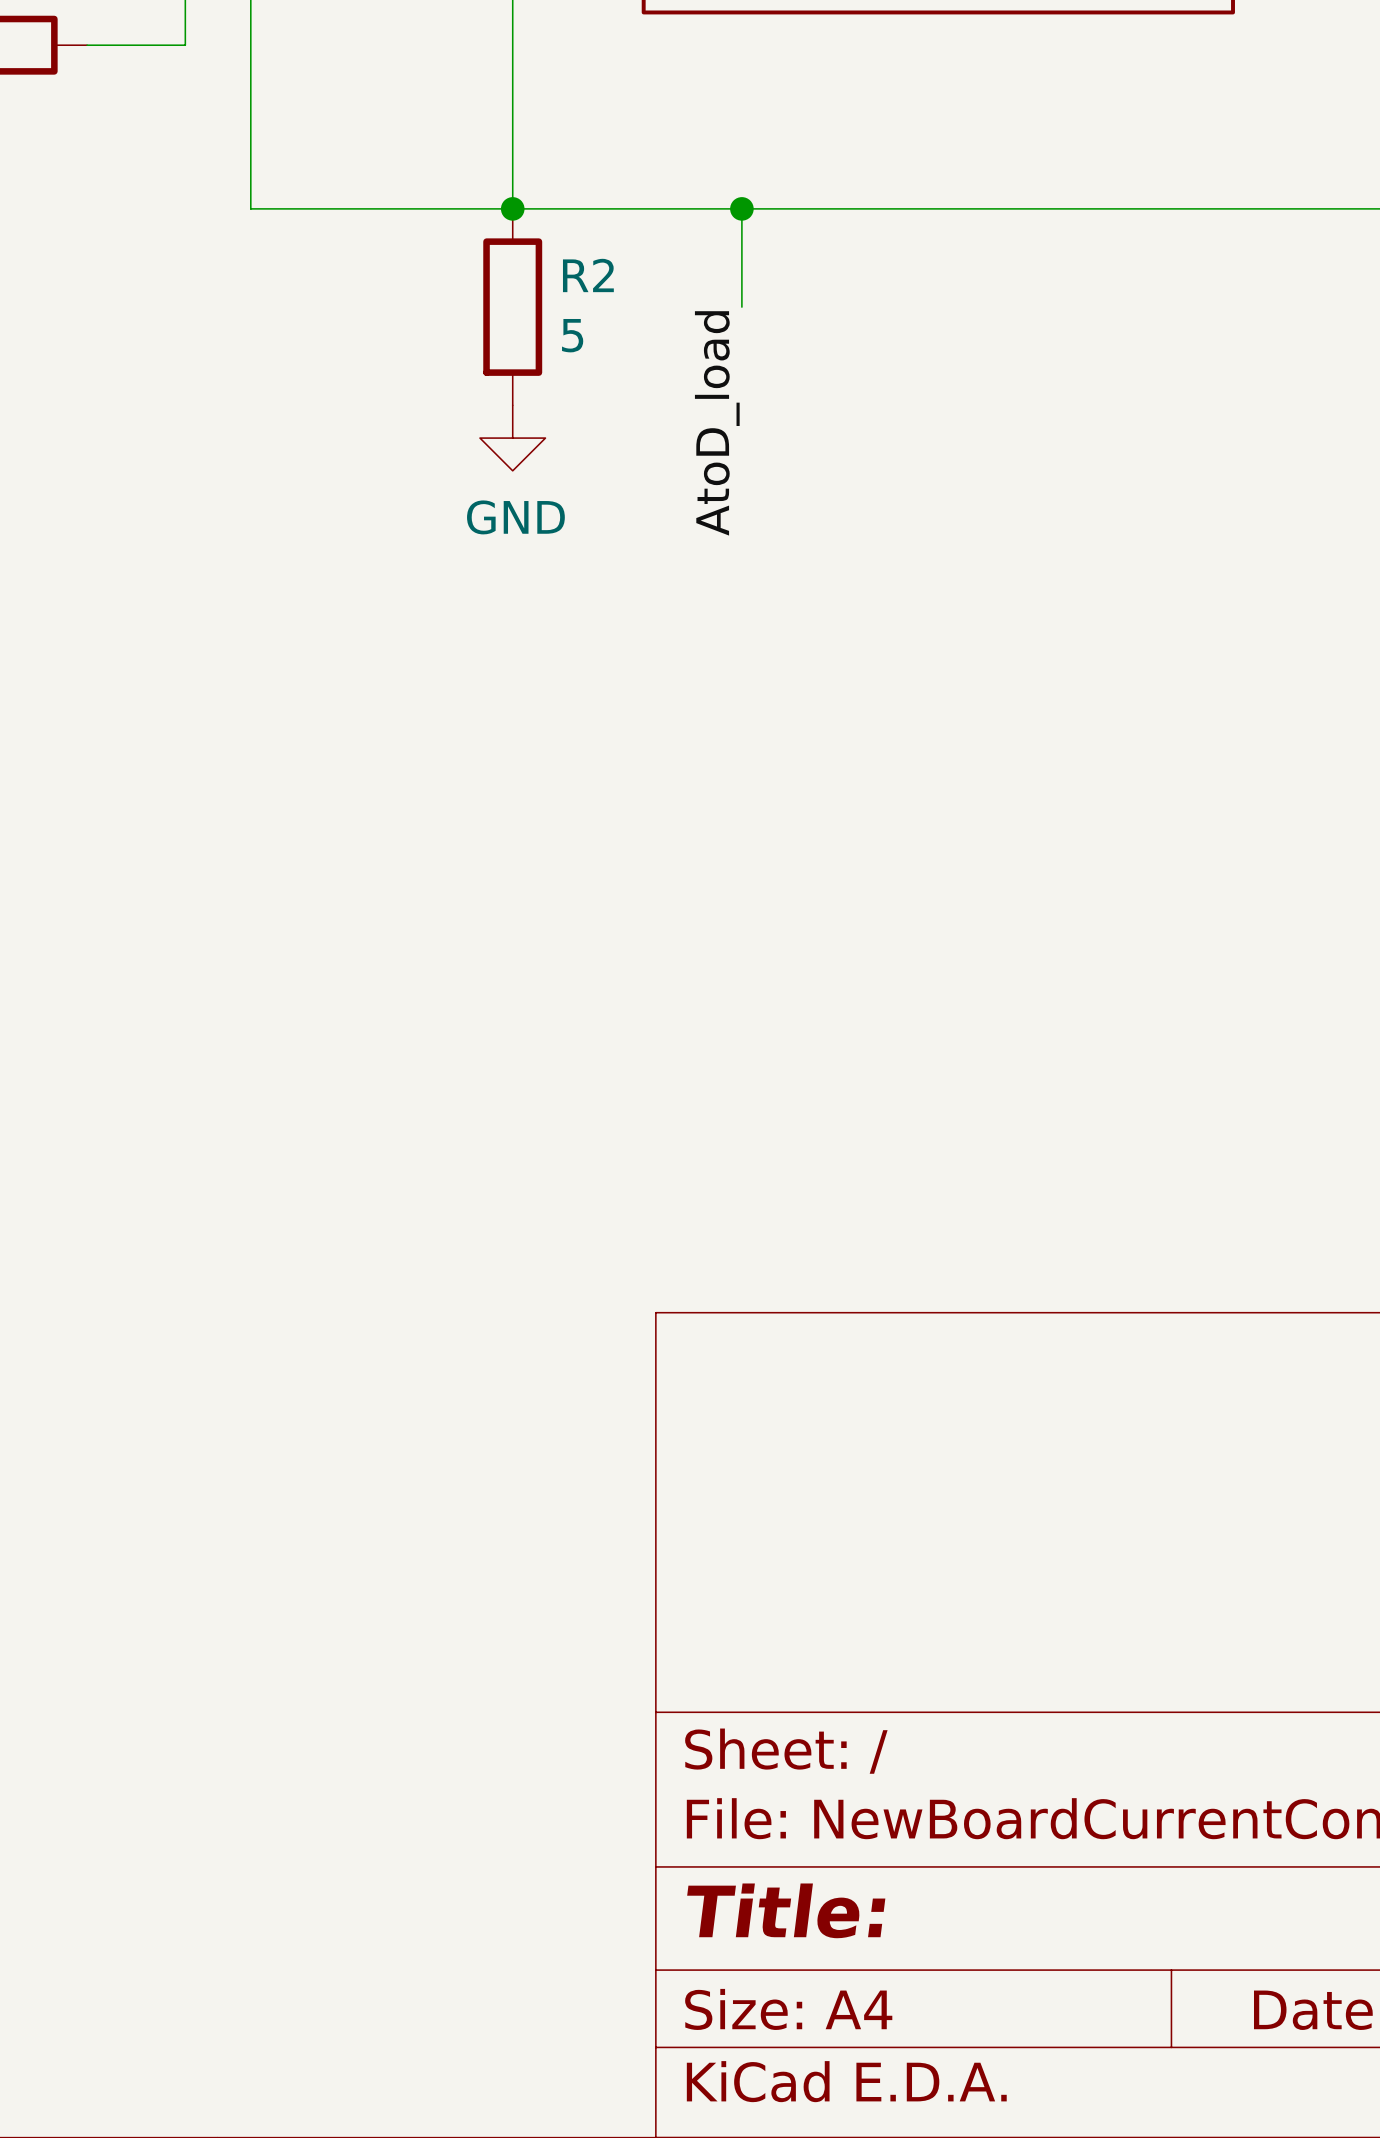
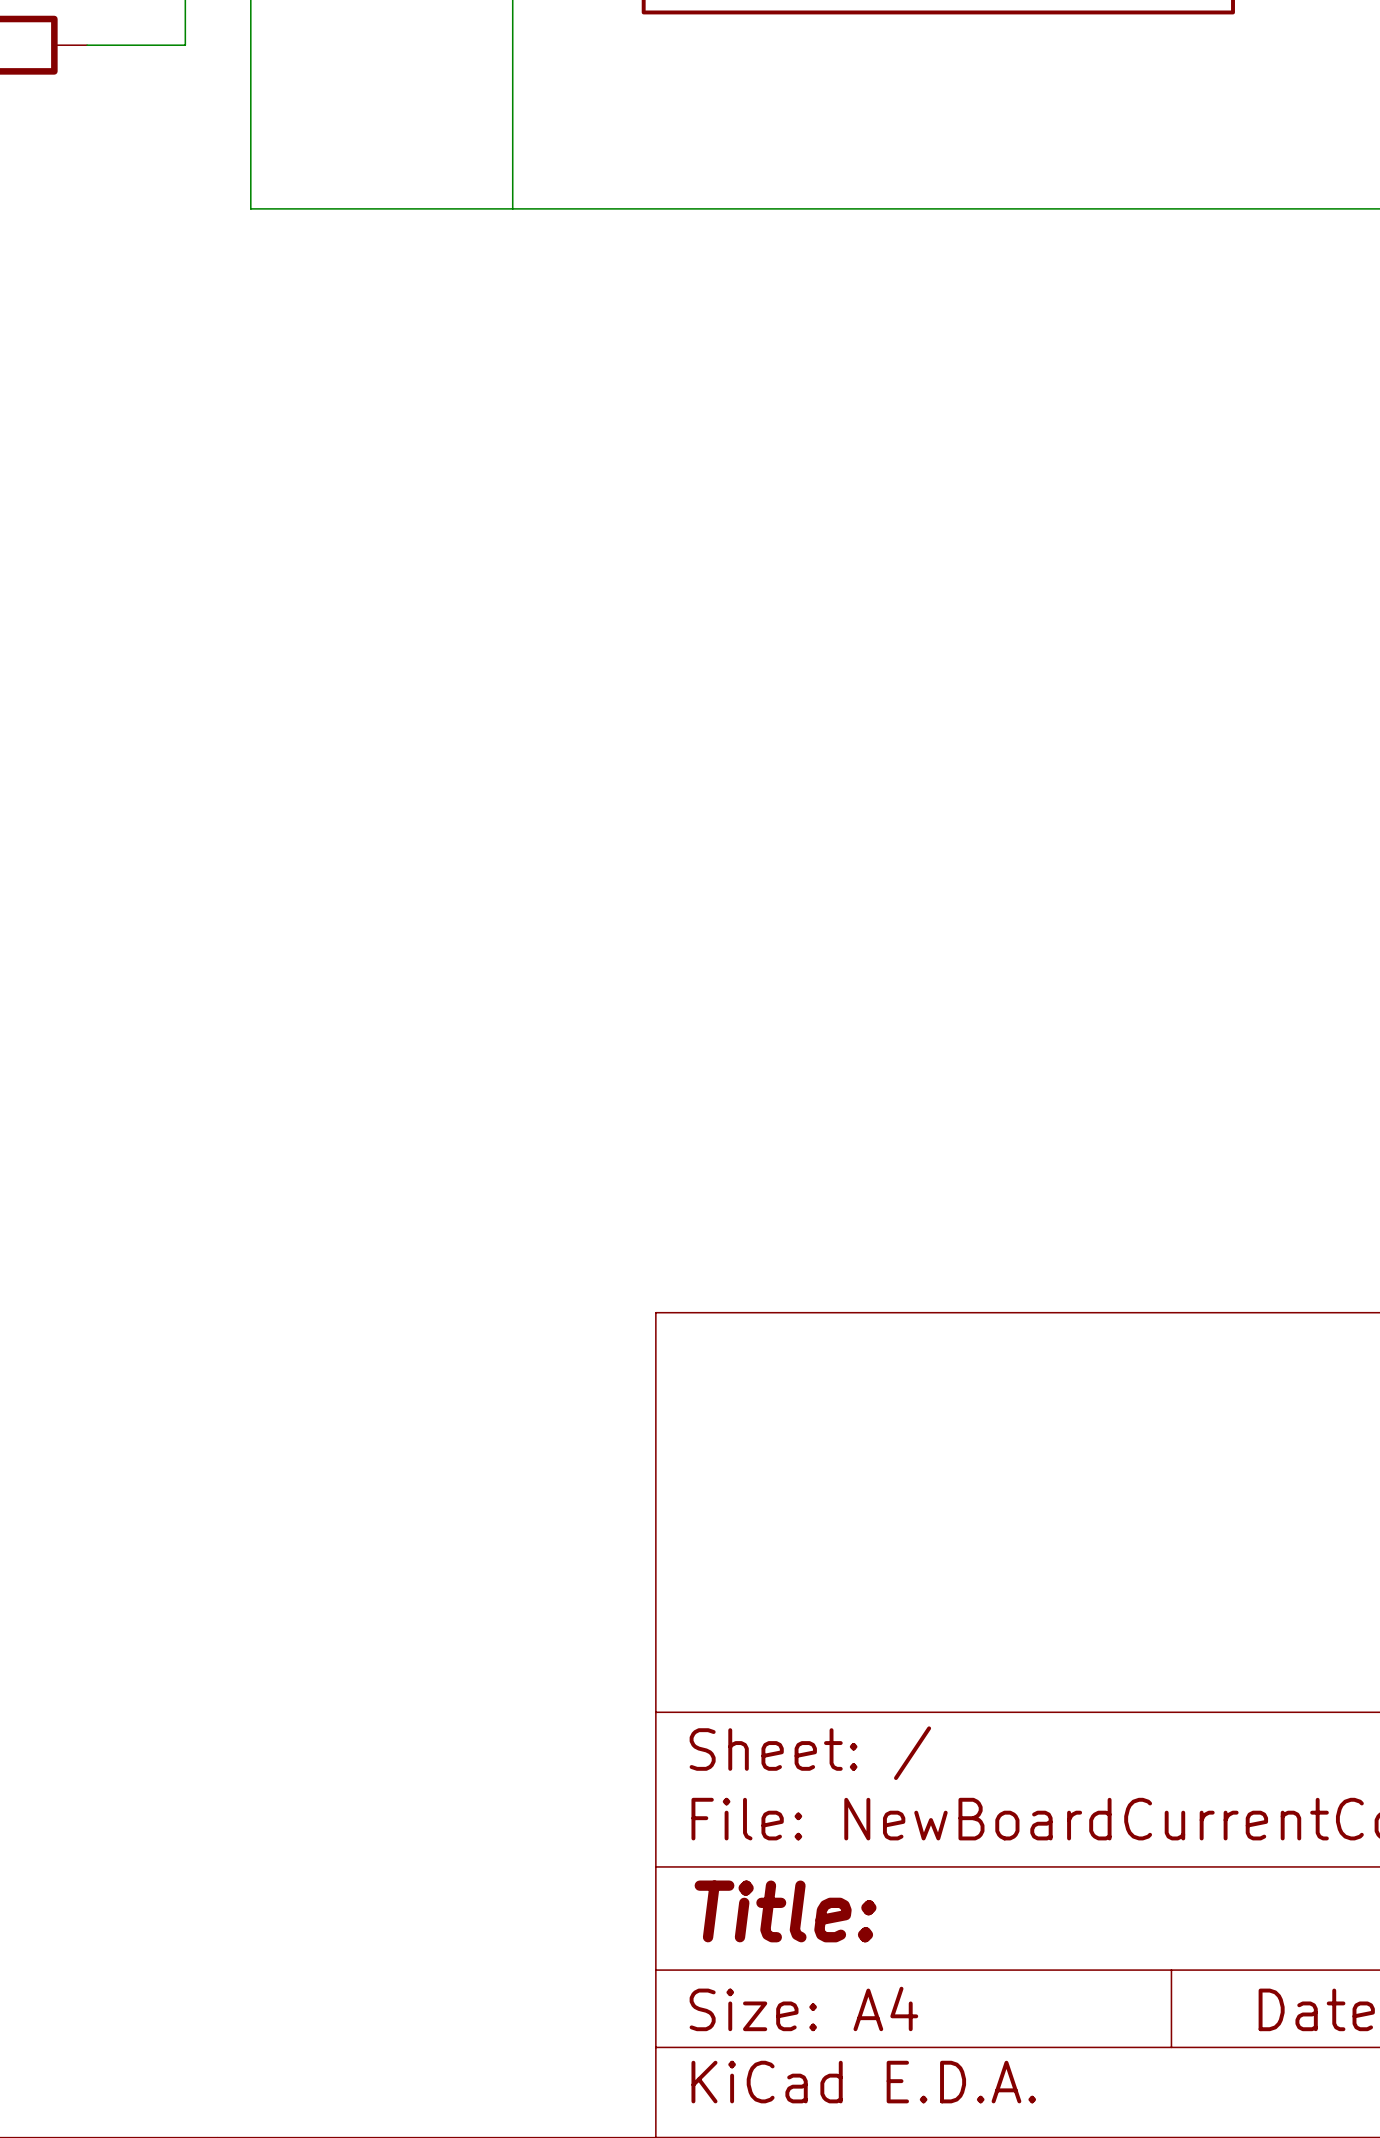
junction: (512, 208) -> none
wire: (741, 208) (741, 307) -> none
junction: (741, 208) -> none
R2: 5 (512, 307) -> none
label: AtoD_load (717, 423) -> none
power symbol: GND (512, 438) -> none

